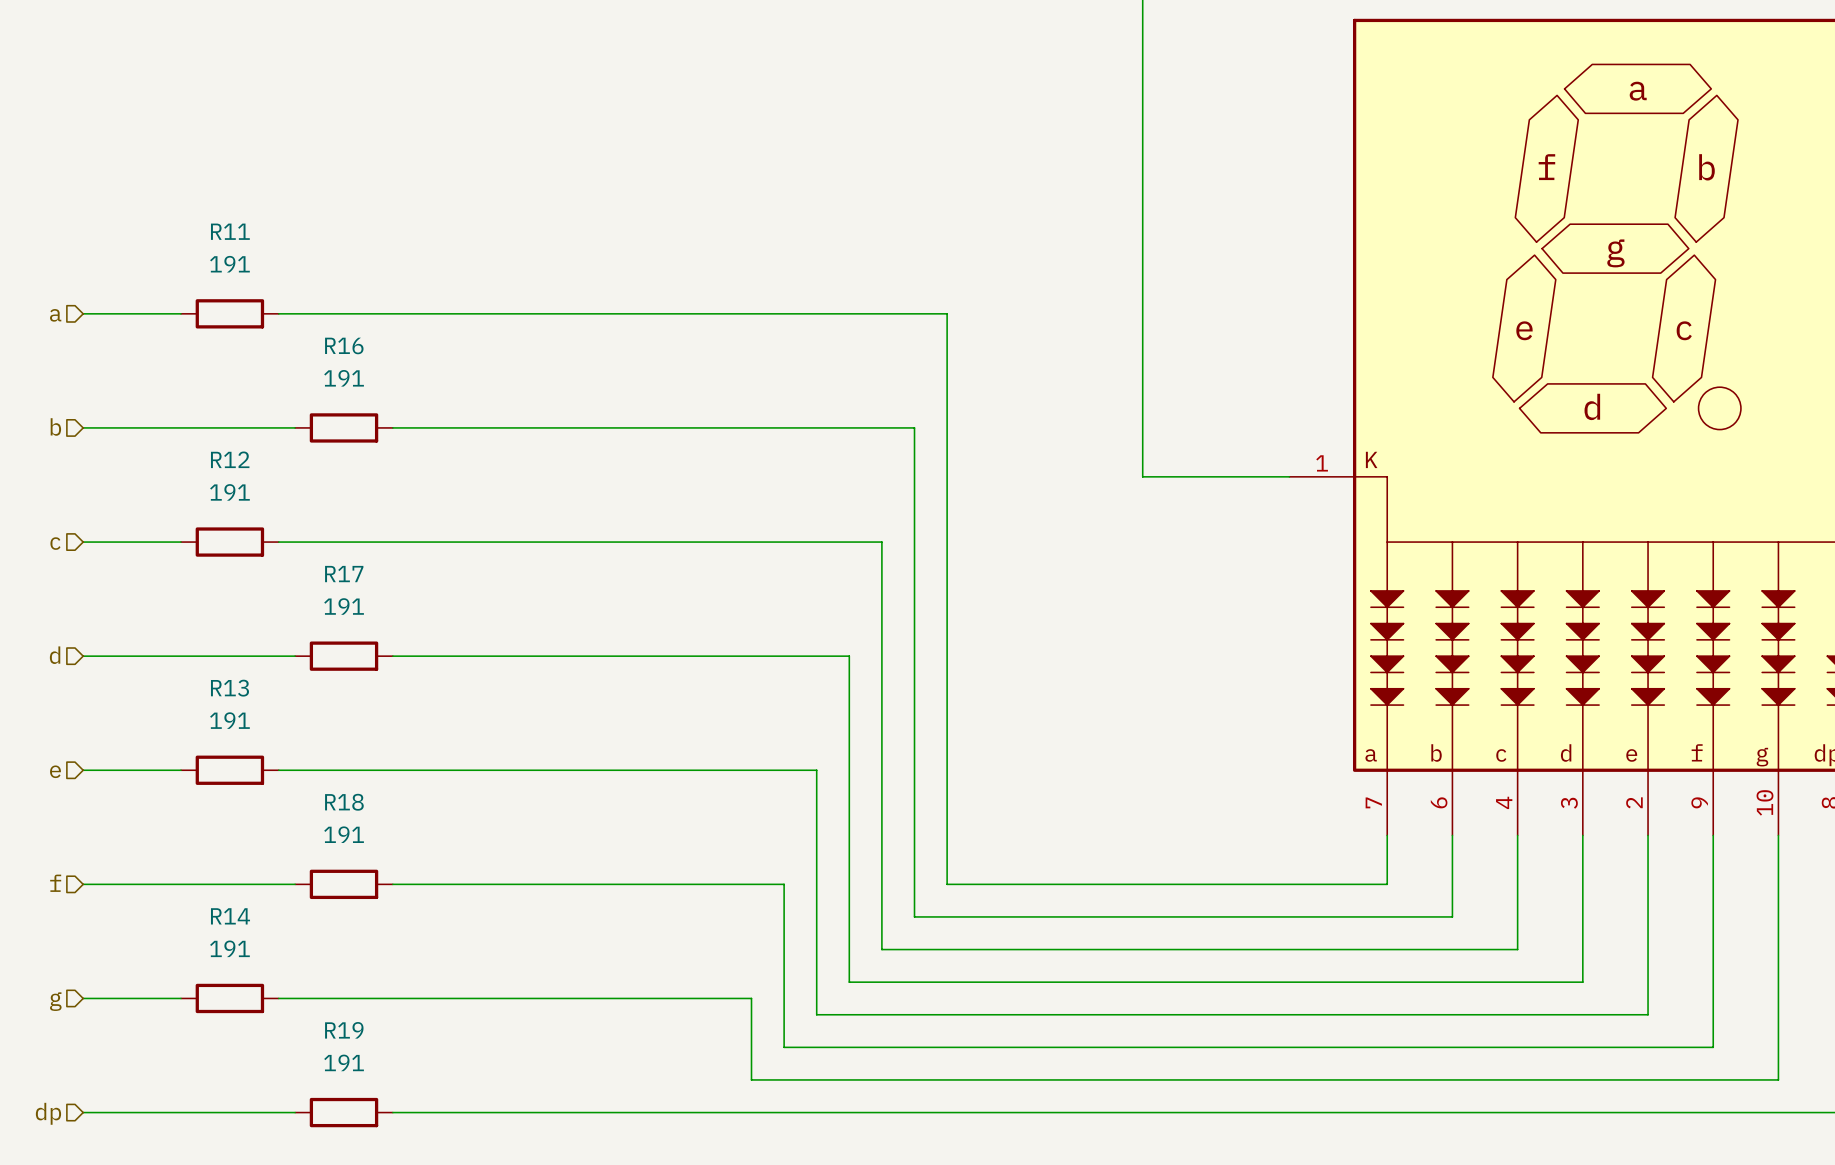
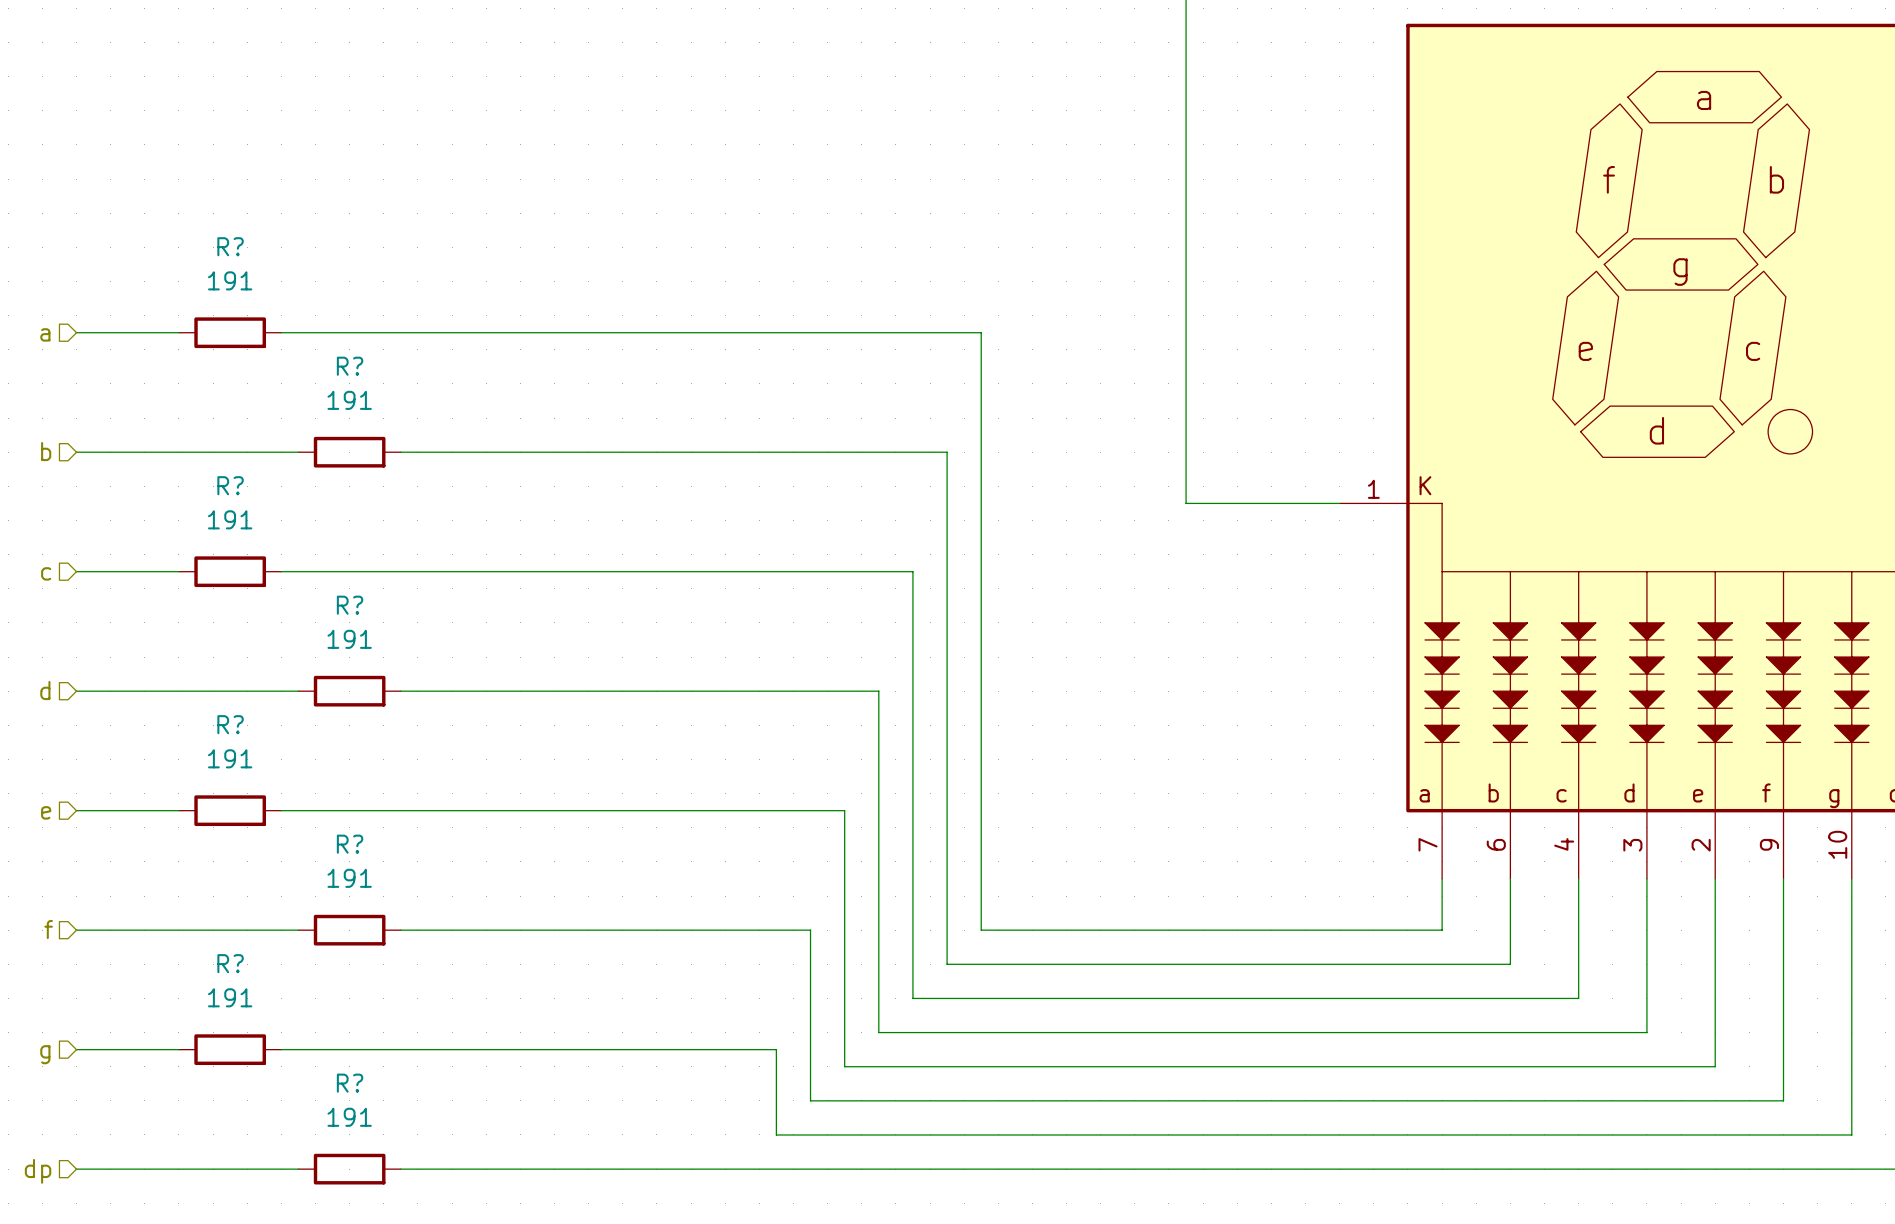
R11 name: R11 (230, 231) -> R? (230, 246)
R16 name: R16 (344, 345) -> R? (350, 366)
R12 name: R12 (230, 459) -> R? (230, 485)
R17 name: R17 (344, 574) -> R? (350, 605)
R13 name: R13 (229, 688) -> R? (230, 724)
R18 name: R18 (344, 802) -> R? (350, 844)
R14 name: R14 (230, 916) -> R? (230, 963)
R19 name: R19 (344, 1030) -> R? (350, 1083)

